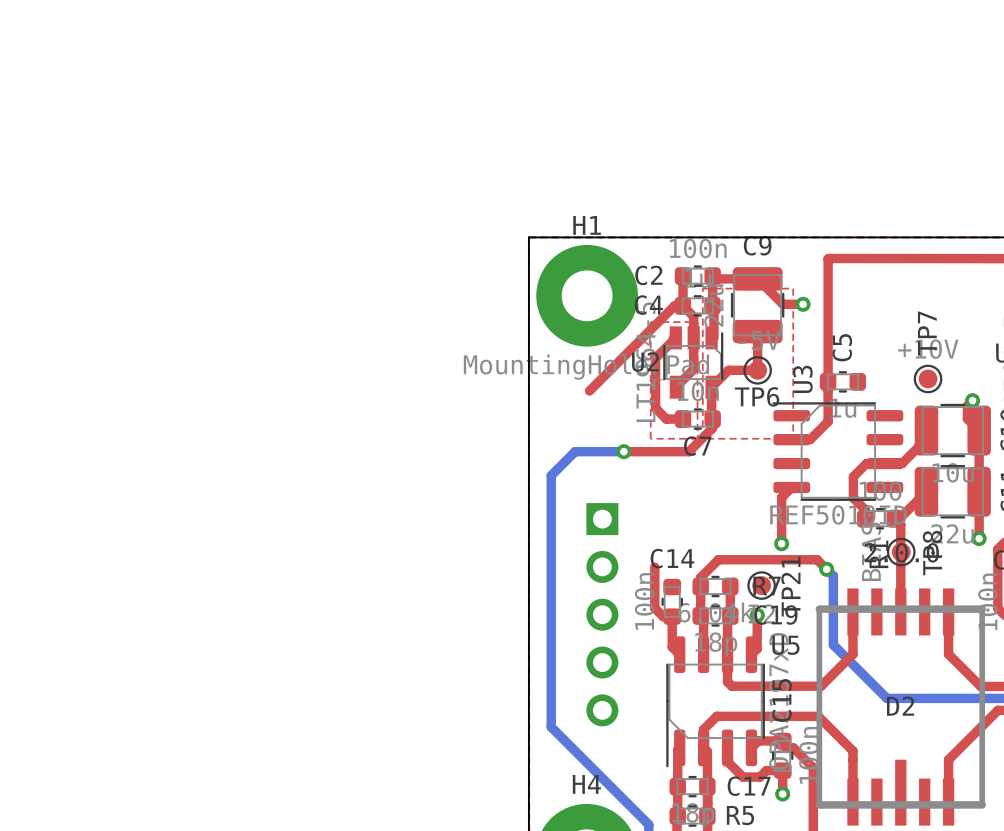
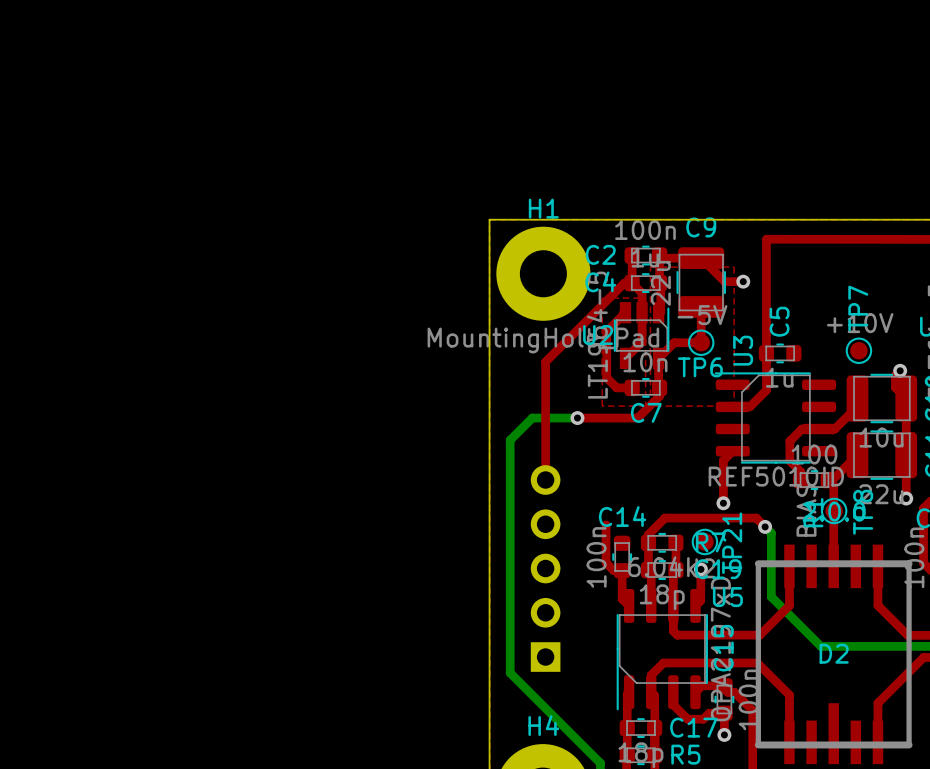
top track: none -> (545, 361) (545, 480)
part rotation: 0° (602, 614) -> 180° (545, 568)

